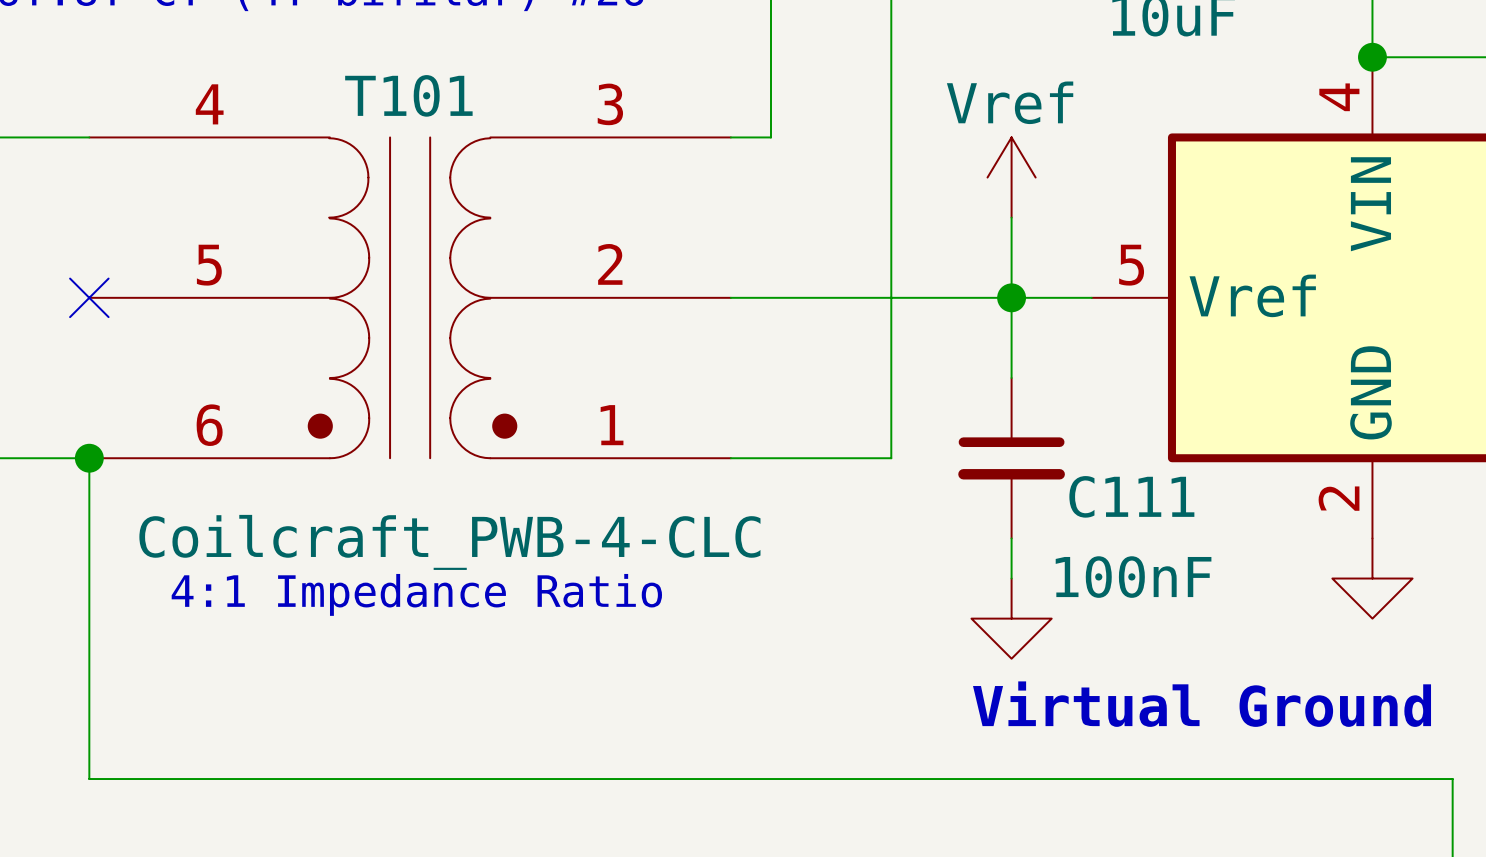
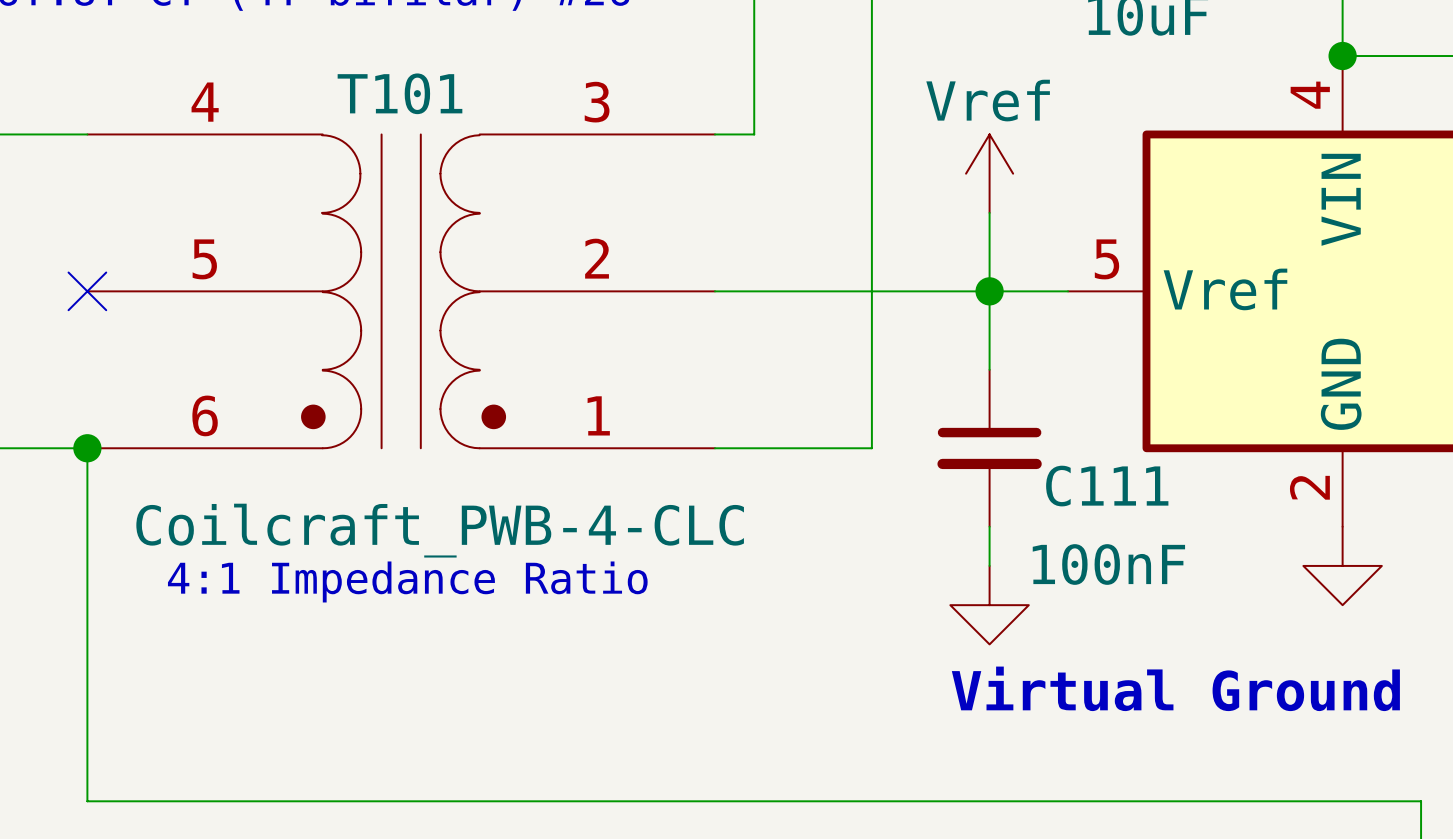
wire: (89, 779) (1452, 779) (1452, 819) -> (87, 762) (87, 801) (1421, 801)

